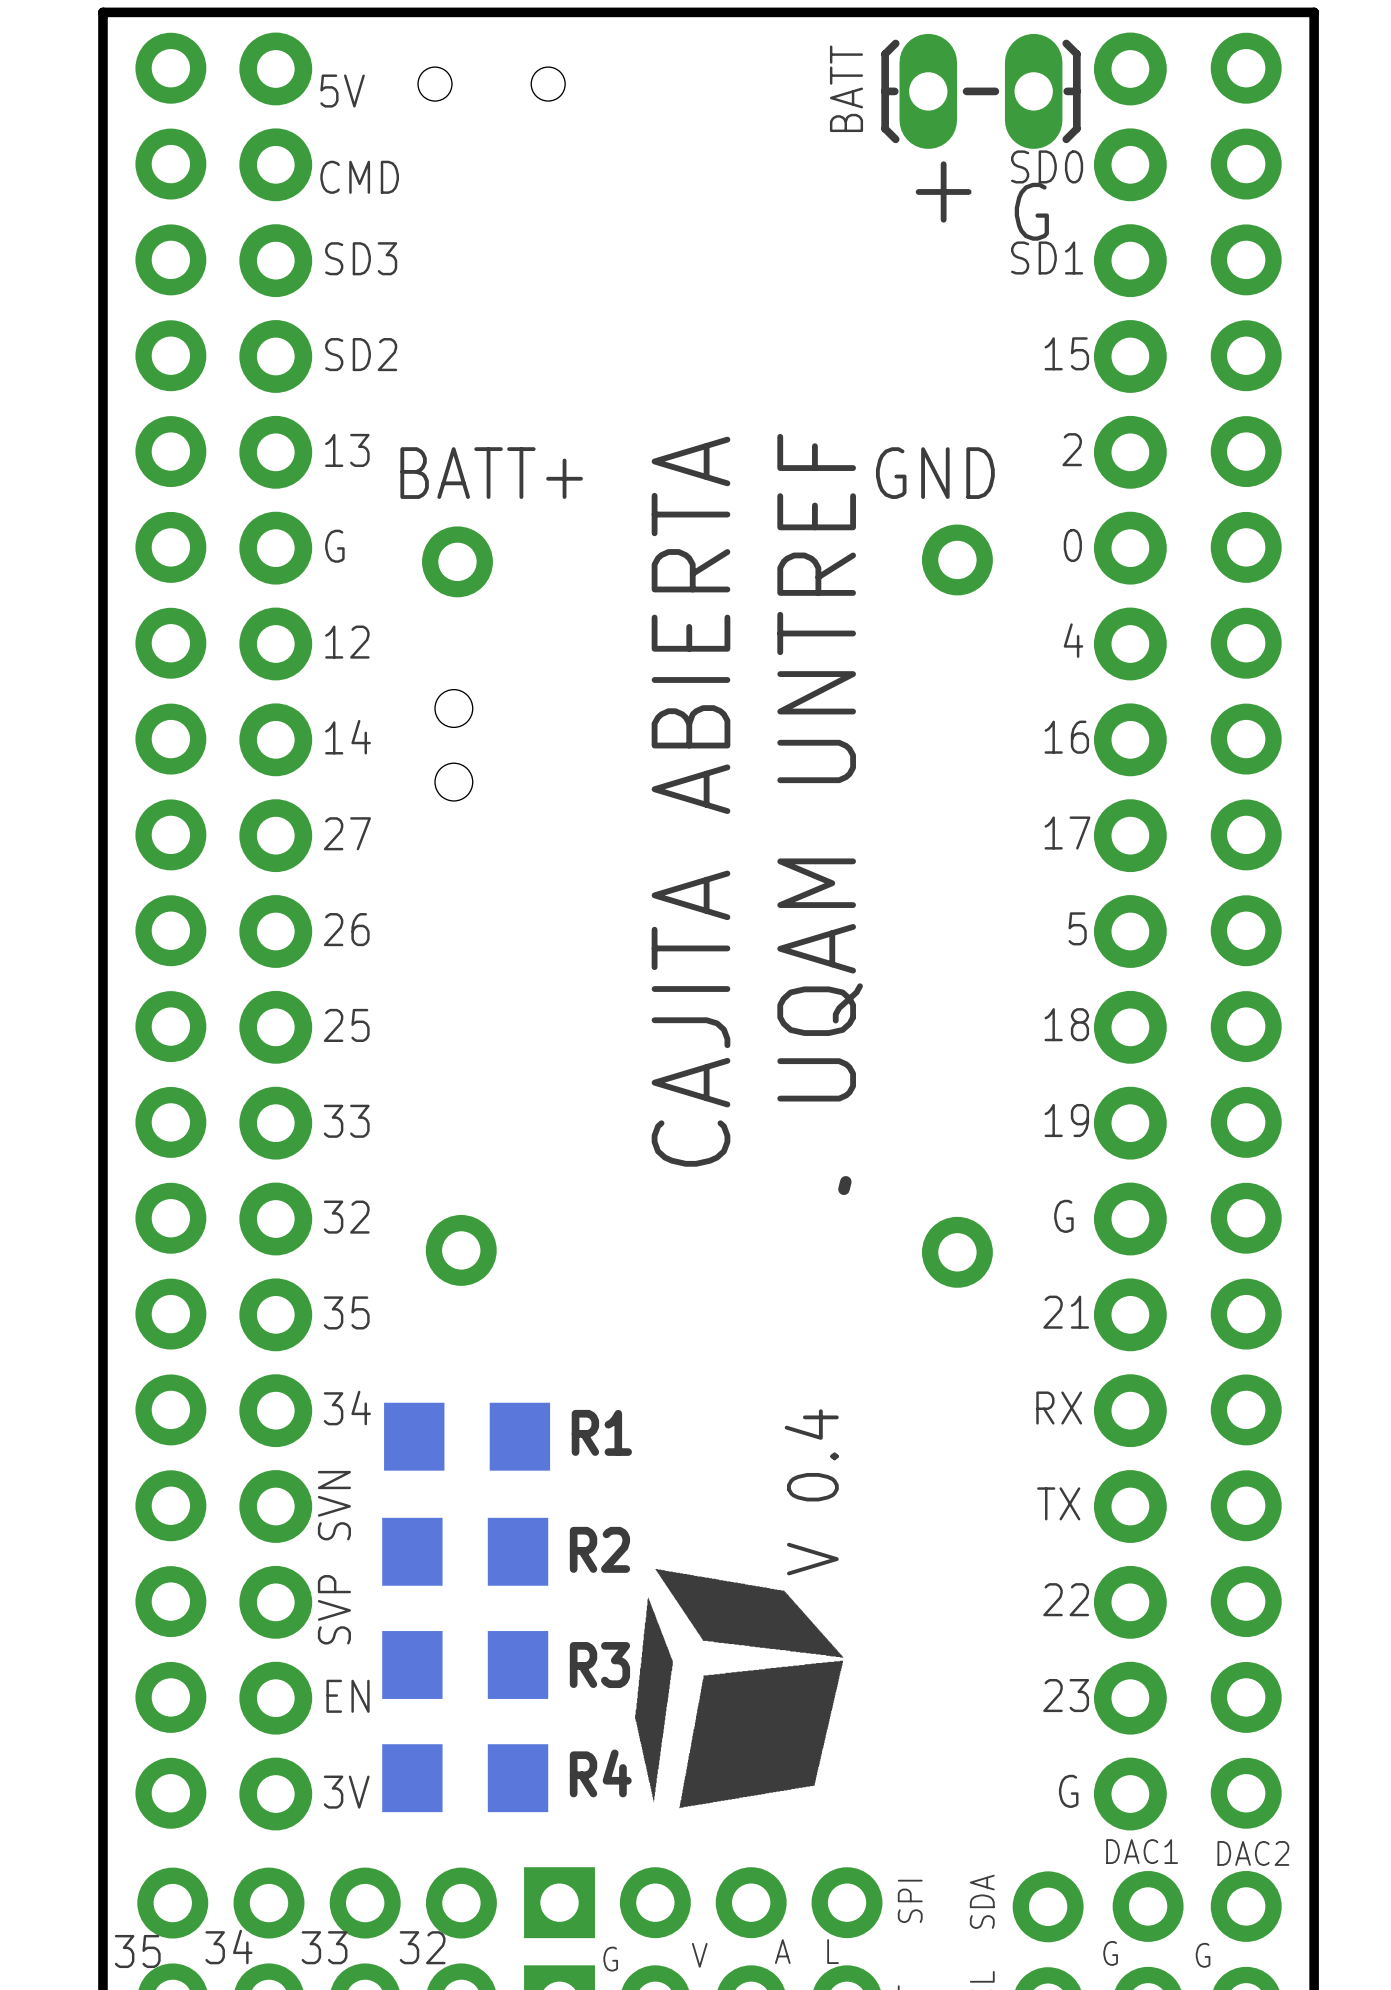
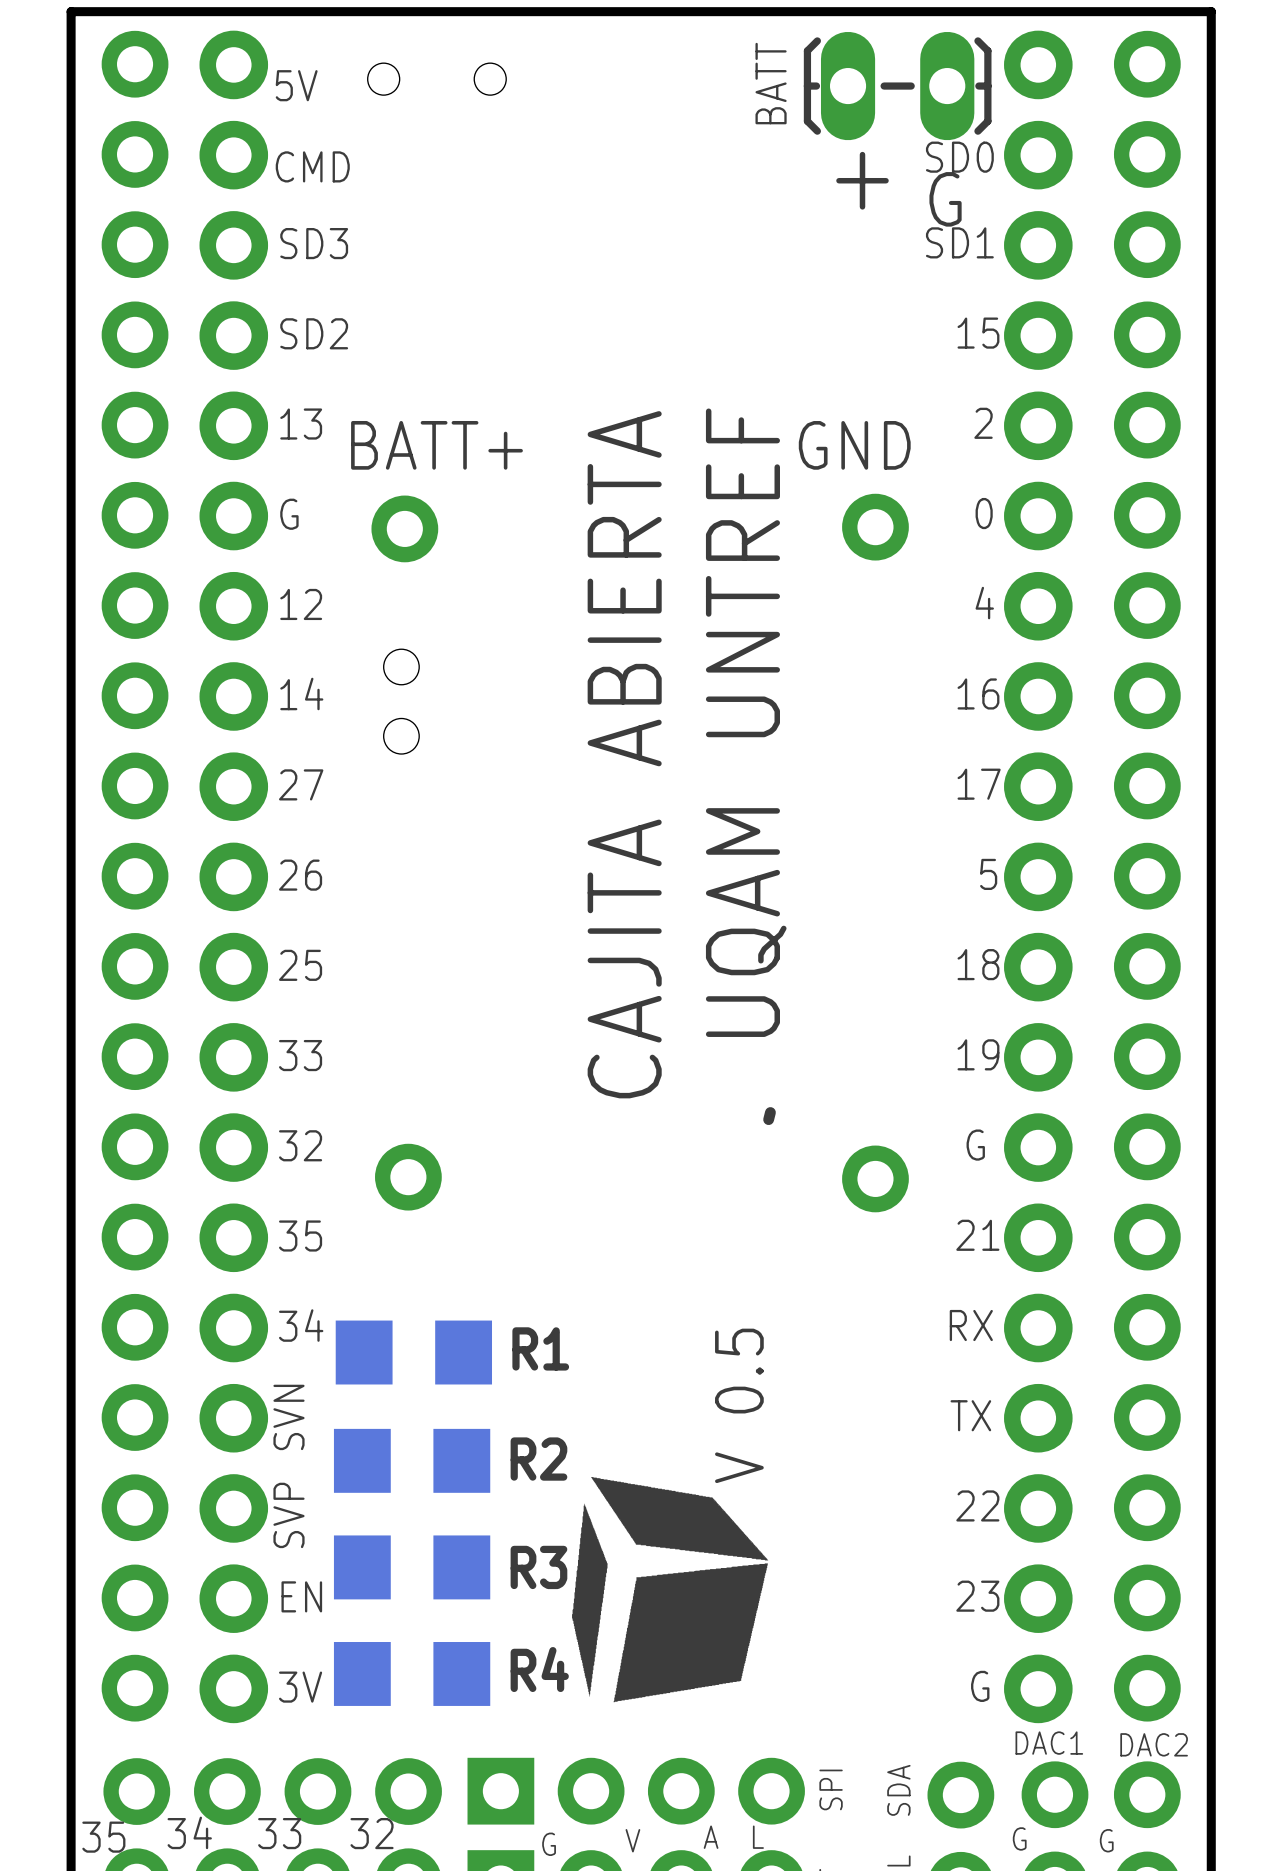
text: V 0.4 (811, 1492) -> V 0.5 (739, 1405)

